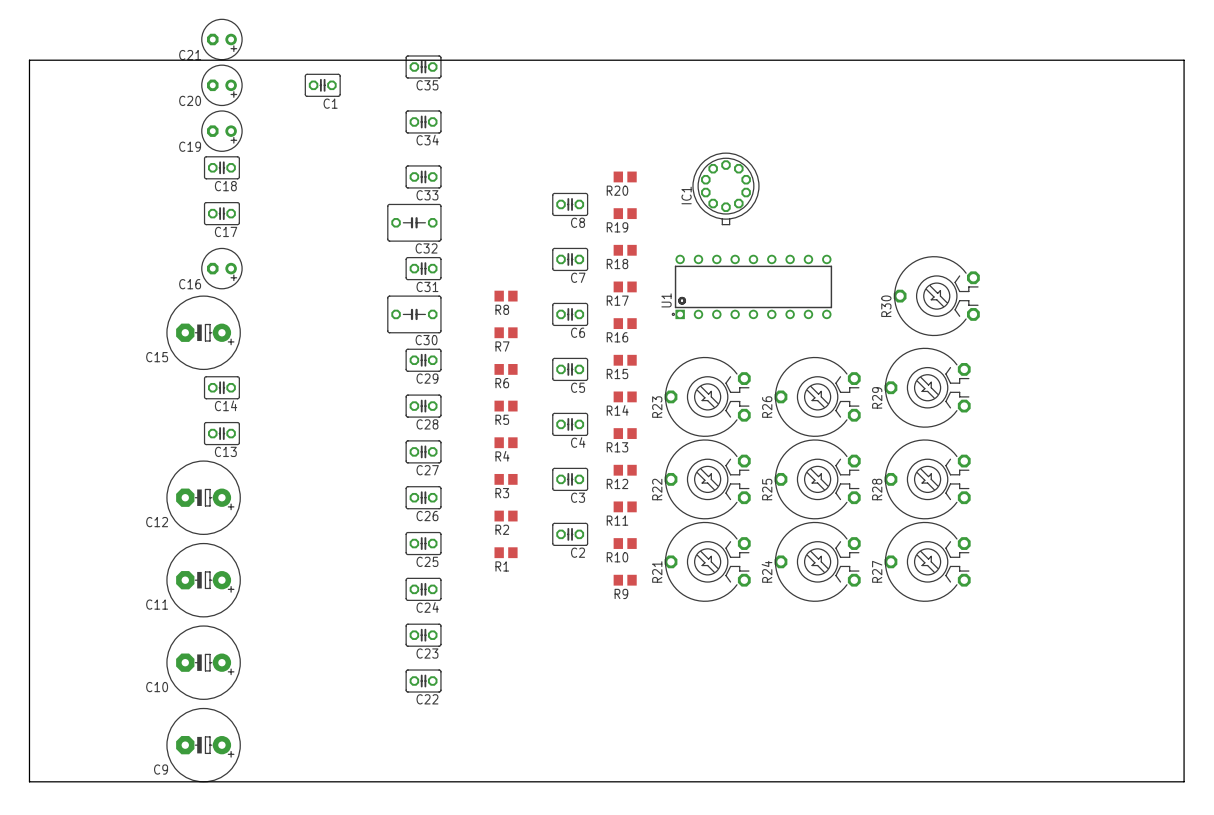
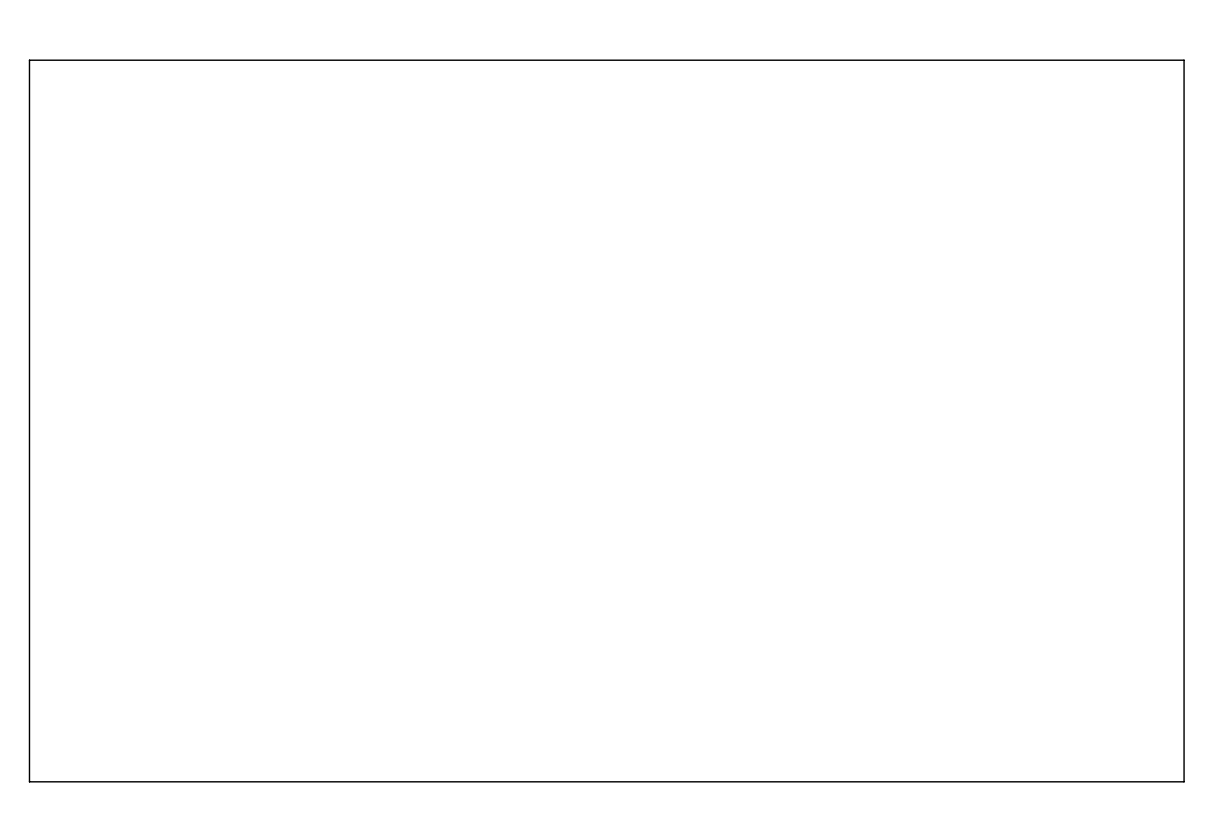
C21: (221, 39) -> none
C35: (423, 66) -> none
C20: (221, 85) -> none
C1: (322, 85) -> none
C34: (423, 121) -> none
C19: (221, 131) -> none
C18: (221, 167) -> none
C33: (423, 176) -> none
R20: (625, 176) -> none
IC1: (725, 188) -> none
C8: (570, 204) -> none
C17: (221, 213) -> none
R19: (625, 213) -> none
C32: (414, 222) -> none
R18: (625, 250) -> none
C7: (570, 259) -> none
C16: (221, 268) -> none
C31: (423, 268) -> none
R17: (625, 286) -> none
U1: (752, 286) -> none
R8: (506, 296) -> none
R30: (936, 296) -> none
C30: (414, 314) -> none
C6: (570, 314) -> none
R16: (625, 323) -> none
C15: (203, 332) -> none
R7: (506, 332) -> none
C29: (423, 360) -> none
R15: (625, 360) -> none
R6: (506, 369) -> none
C5: (570, 369) -> none
C14: (221, 387) -> none
R29: (927, 387) -> none
R14: (625, 396) -> none
R23: (707, 396) -> none
R26: (817, 396) -> none
C28: (423, 406) -> none
R5: (506, 406) -> none
C4: (570, 424) -> none
C13: (221, 433) -> none
R13: (625, 433) -> none
R4: (506, 442) -> none
C27: (423, 451) -> none
R12: (625, 470) -> none
R3: (506, 479) -> none
C3: (570, 479) -> none
R22: (707, 479) -> none
R25: (817, 479) -> none
R28: (927, 479) -> none
C12: (203, 497) -> none
C26: (423, 497) -> none
R11: (625, 506) -> none
R2: (506, 516) -> none
C2: (570, 534) -> none
C25: (423, 543) -> none
R10: (625, 543) -> none
R1: (506, 552) -> none
R21: (707, 561) -> none
R24: (817, 561) -> none
R27: (927, 561) -> none
C11: (203, 580) -> none
R9: (625, 580) -> none
C24: (423, 589) -> none
C23: (423, 635) -> none
C10: (203, 662) -> none
C22: (423, 681) -> none
C9: (203, 745) -> none

